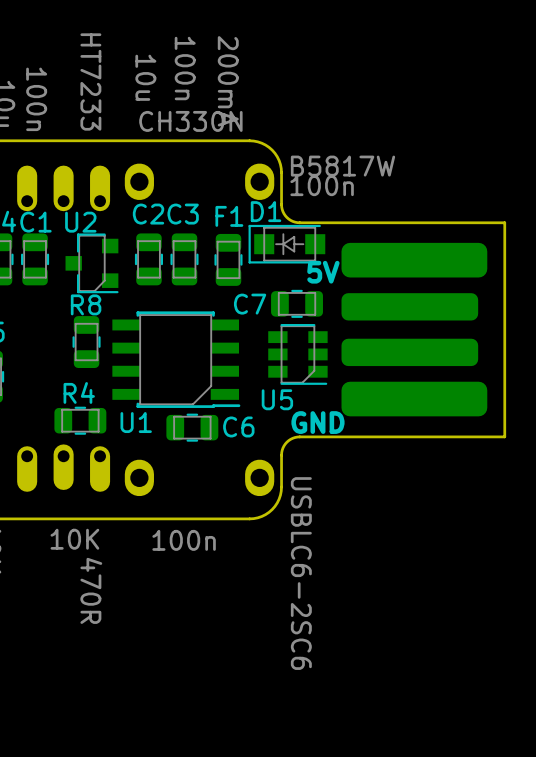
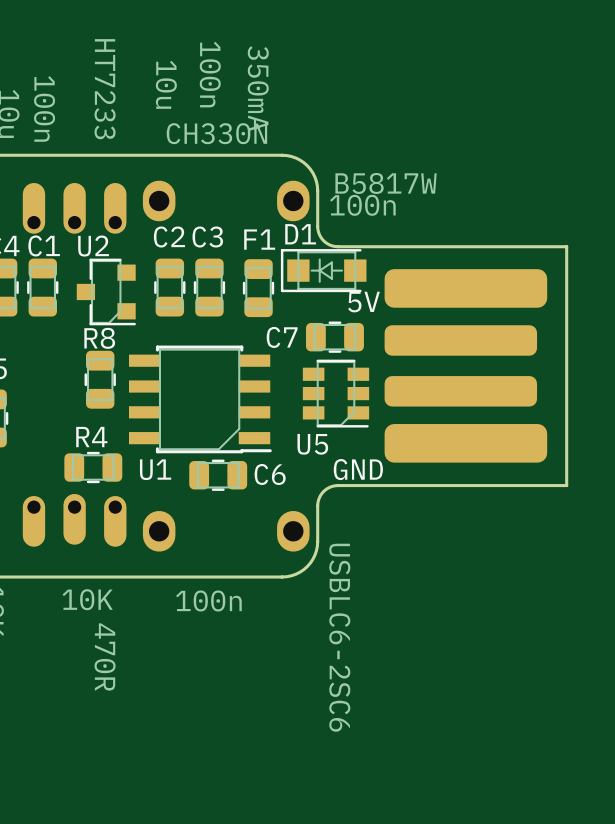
F1 value: 200mA (228, 81) -> 350mA (258, 88)

